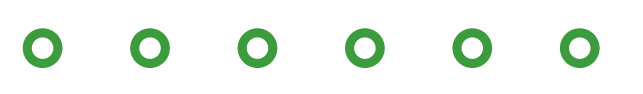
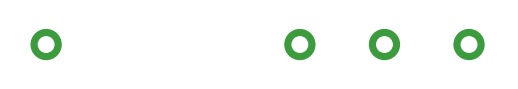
part: (150, 48) -> none
part: (257, 48) -> none

